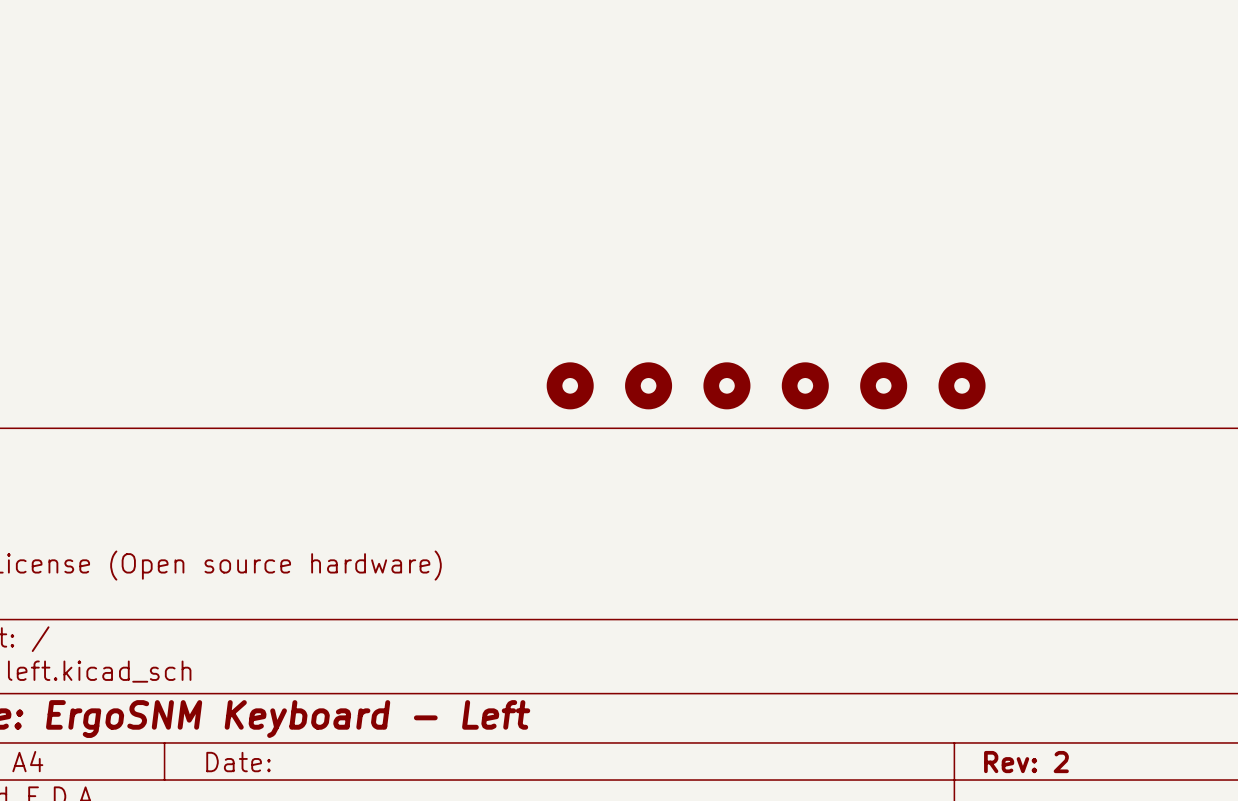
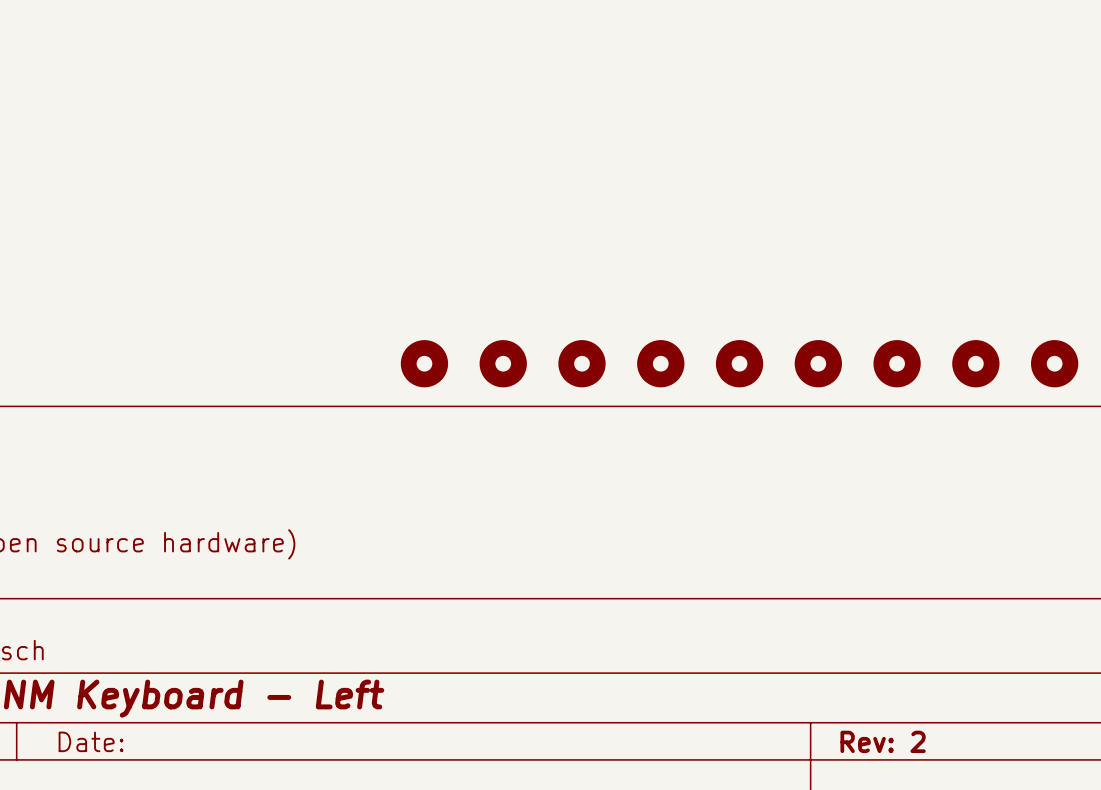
part: none -> (897, 363)
part: none -> (975, 363)
part: none -> (1054, 363)

